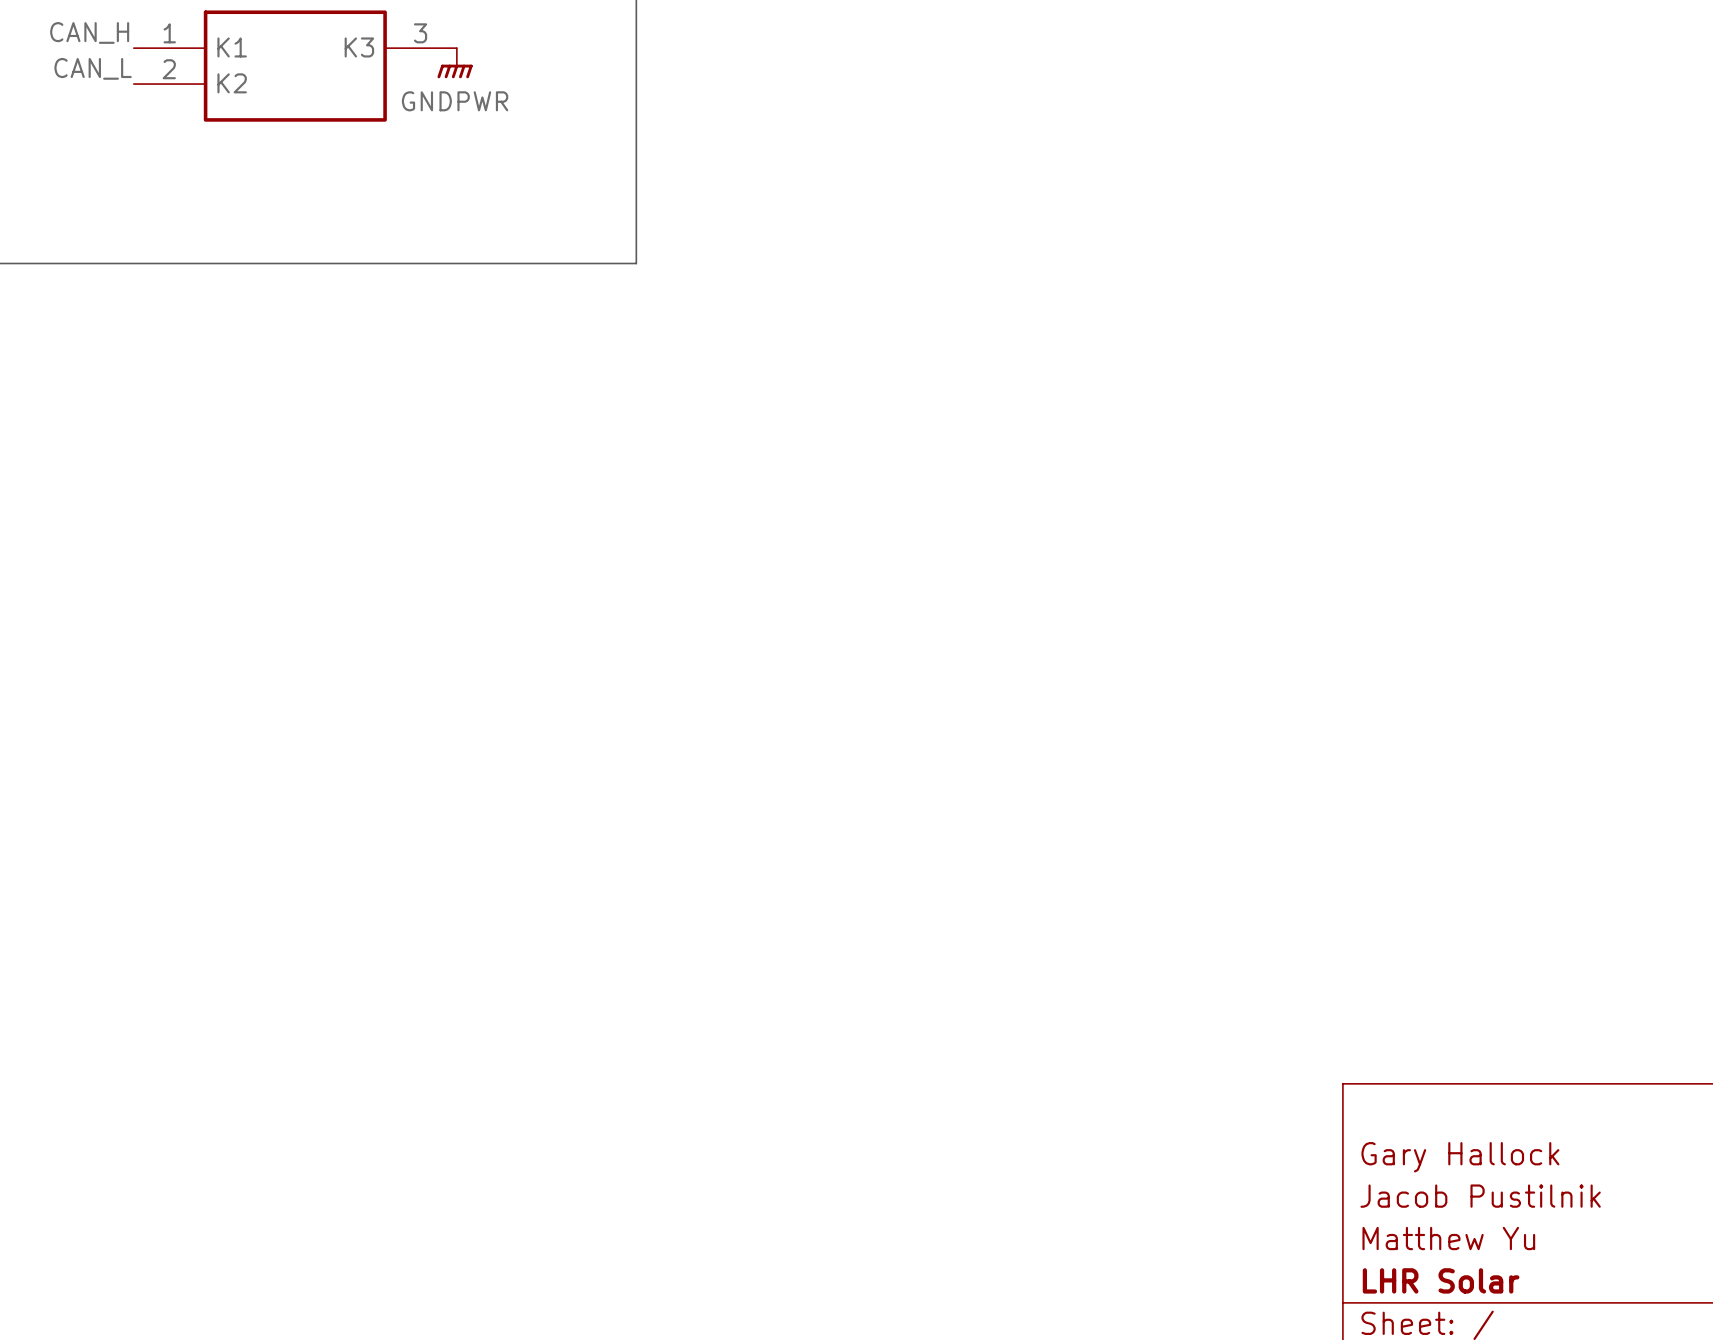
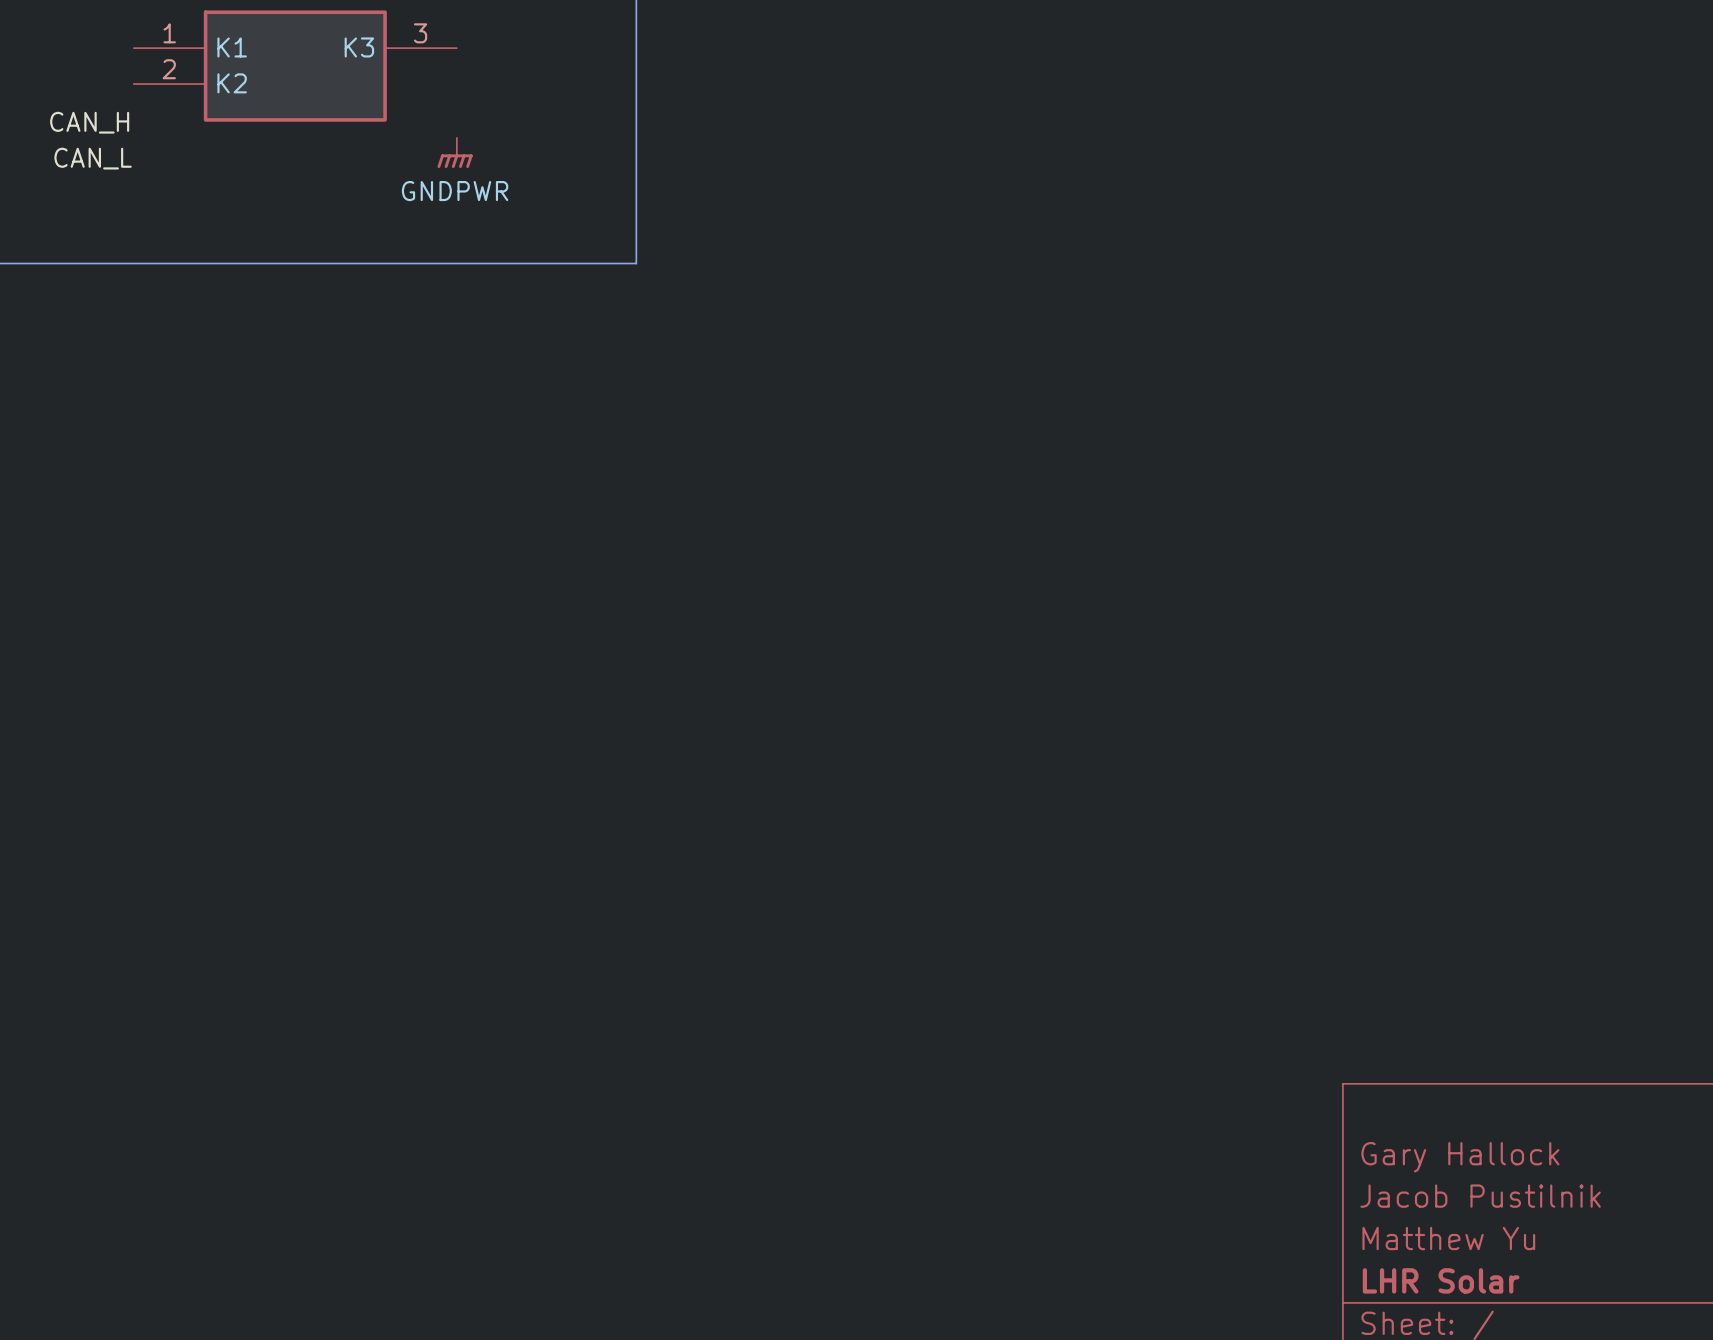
label position: CAN_H (89, 32) -> CAN_H (89, 122)
power symbol position: GNDPWR (455, 63) -> GNDPWR (455, 152)
label position: CAN_L (93, 68) -> CAN_L (93, 158)

